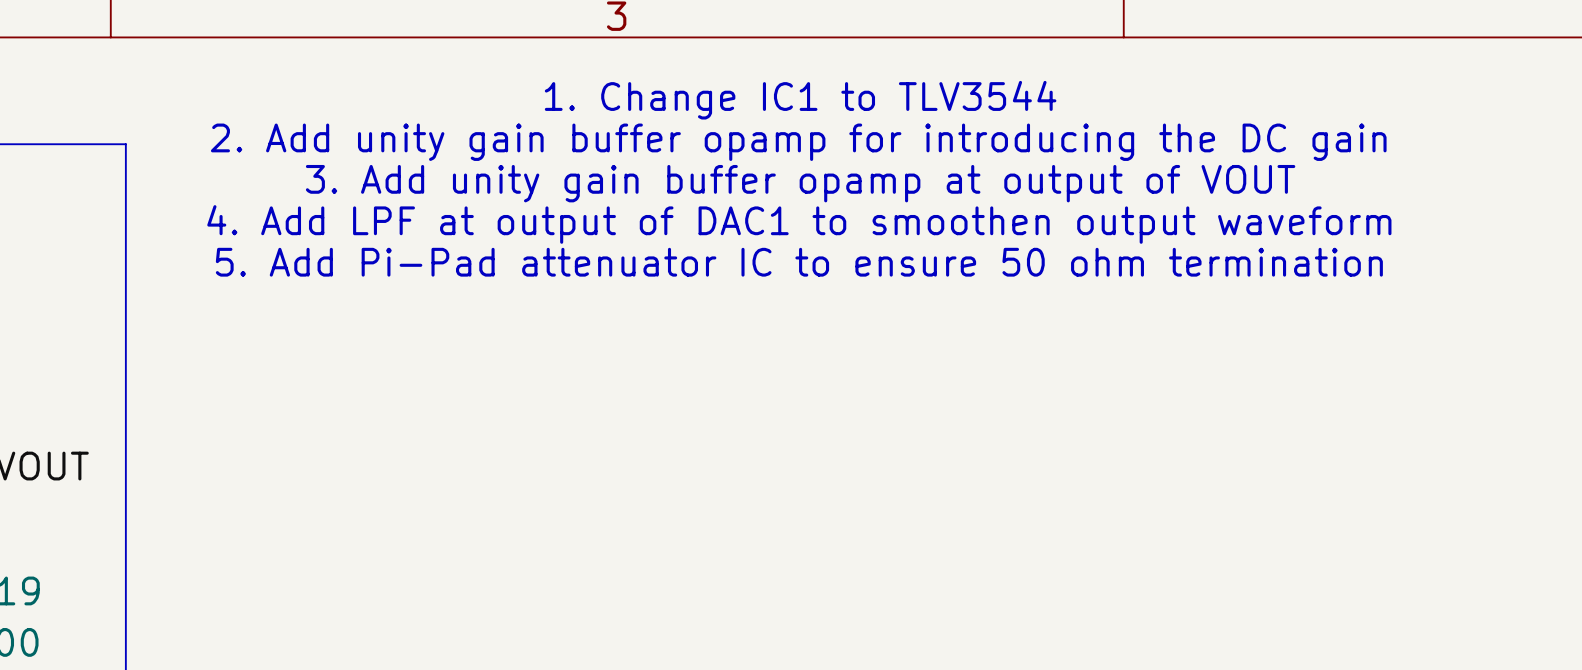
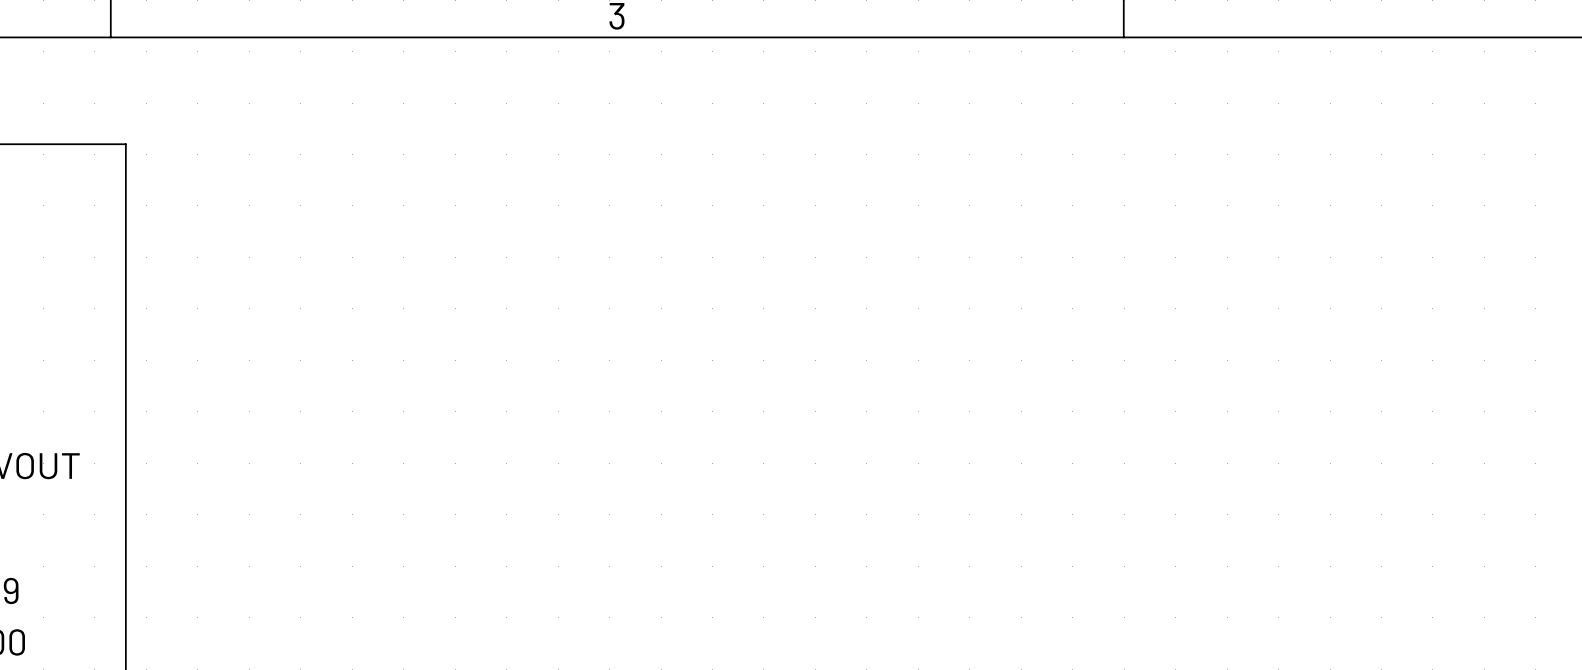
text: 1. Change IC1 to TLV3544 (800, 100) -> none
text: 2. Add unity gain buffer opamp for introducing the DC gain (798, 142) -> none
text: 3. Add unity gain buffer opamp at output of VOUT (800, 183) -> none
text: 4. Add LPF at output of DAC1 to smoothen output waveform (799, 224) -> none
text: 5. Add Pi-Pad attenuator IC to ensure 50 ohm termination (799, 262) -> none

